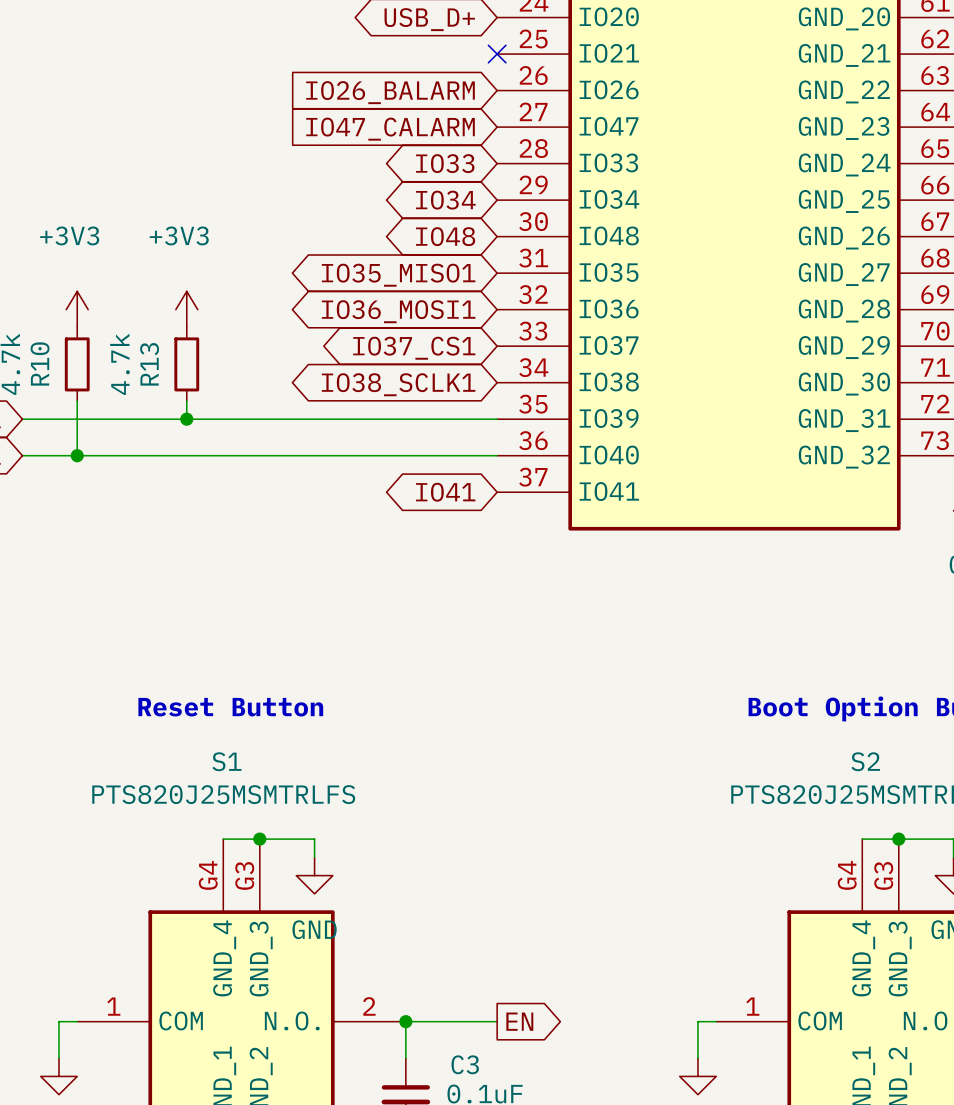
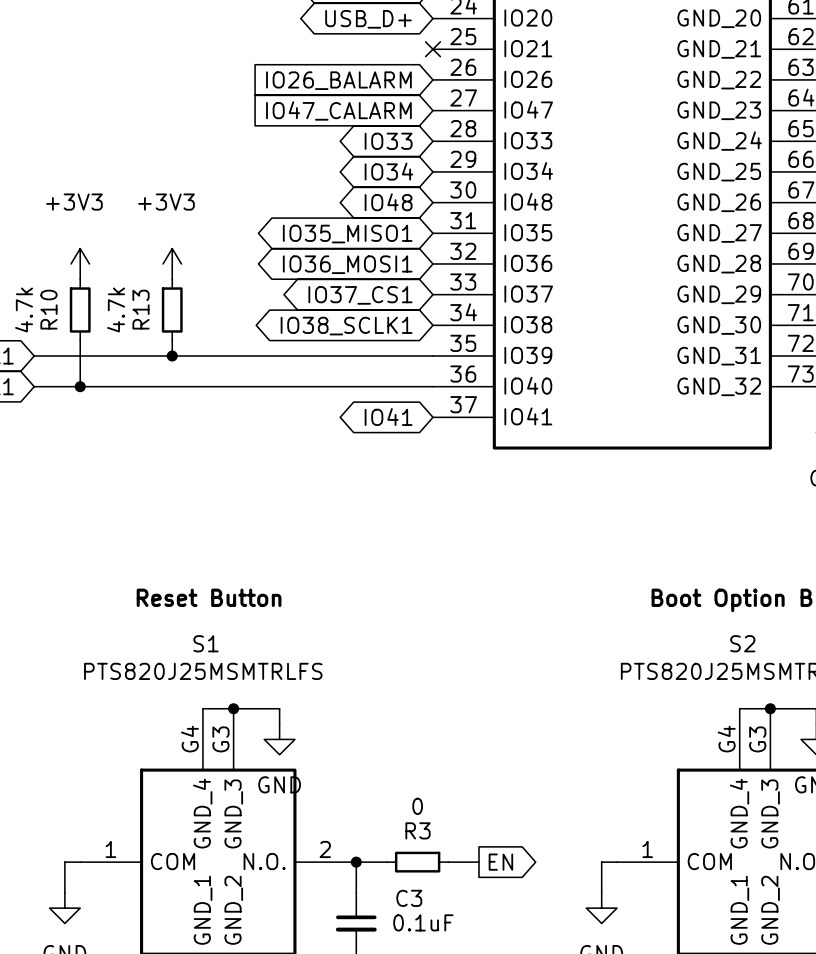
wire: (442, 1021) (497, 1021) -> none
R3: none -> 0 (417, 862)
wire: none -> (448, 862) (478, 862)
global label position: EN (519, 1021) -> EN (500, 862)

